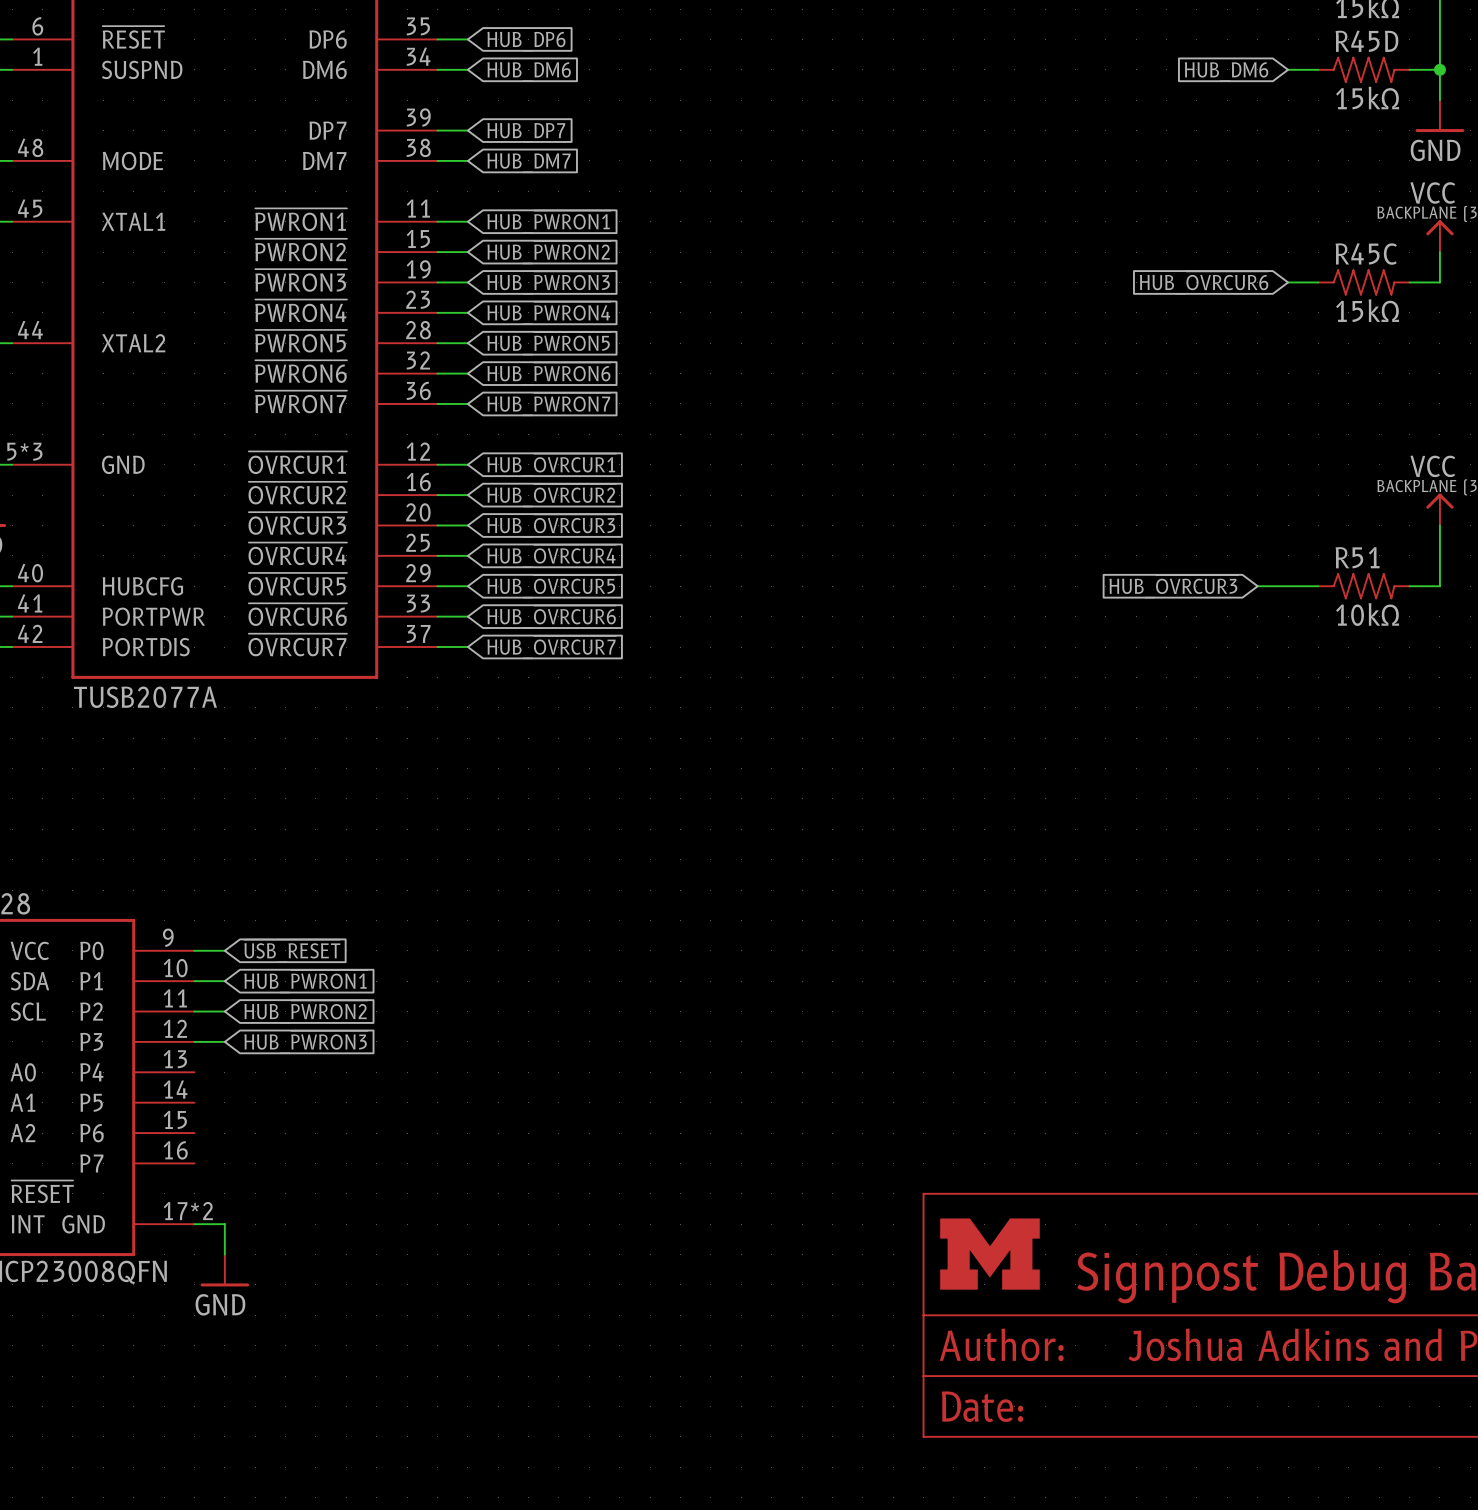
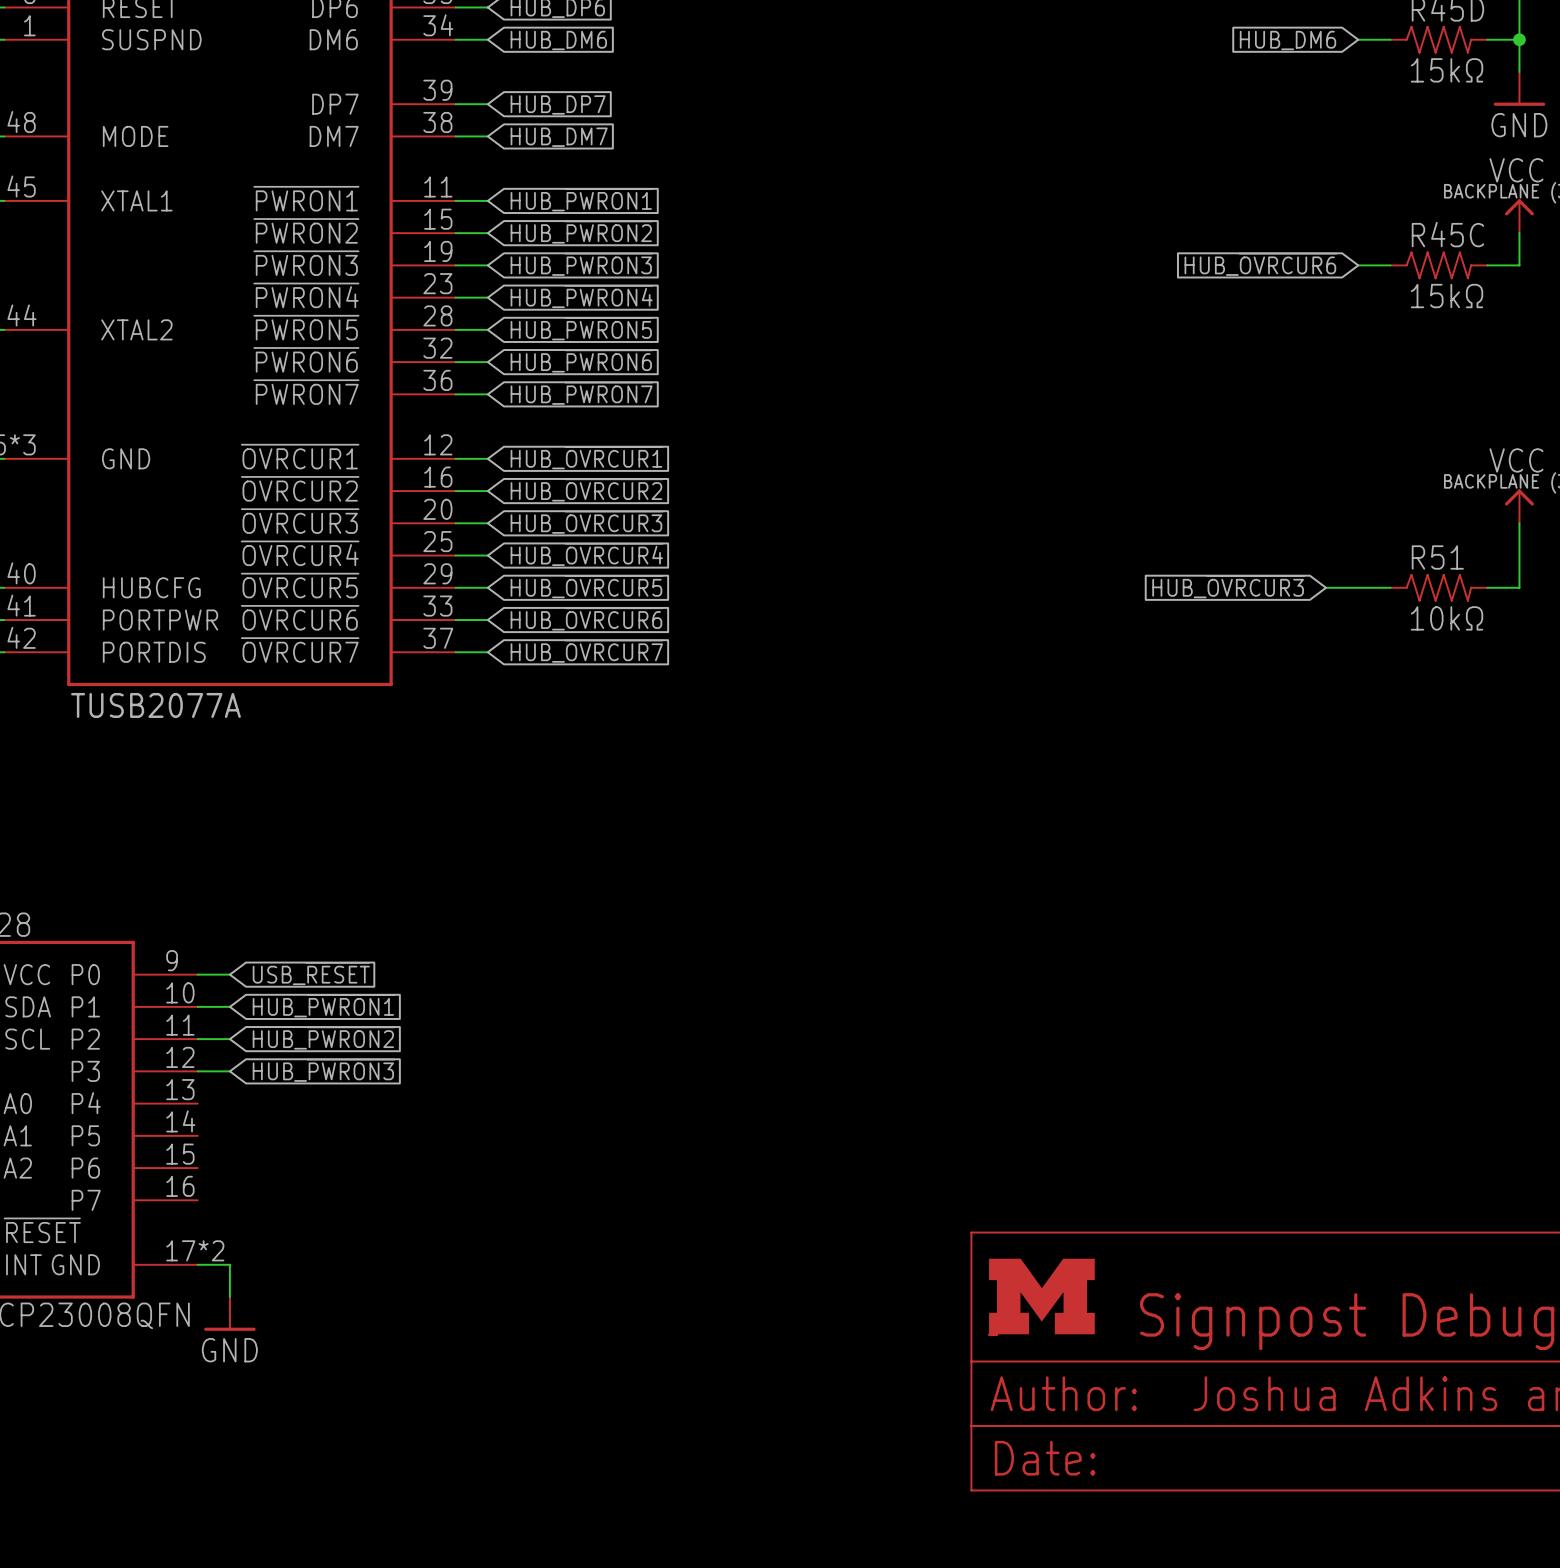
global label: ~{USB_RESET} (292, 951) -> USB_~{RESET} (311, 973)

